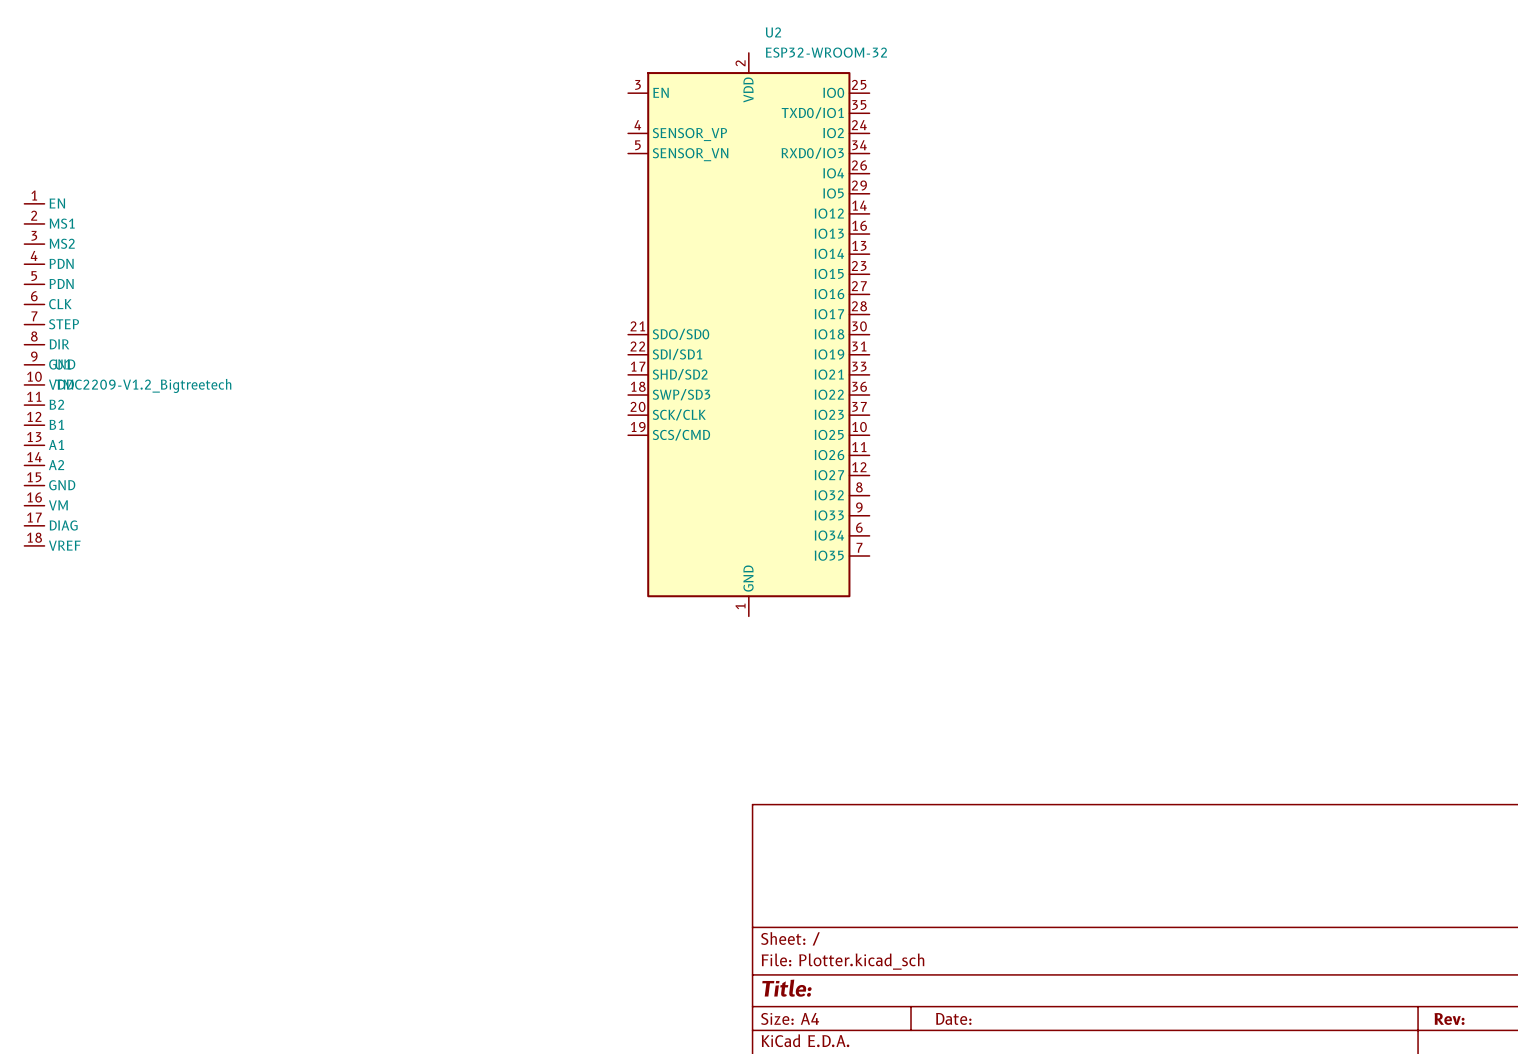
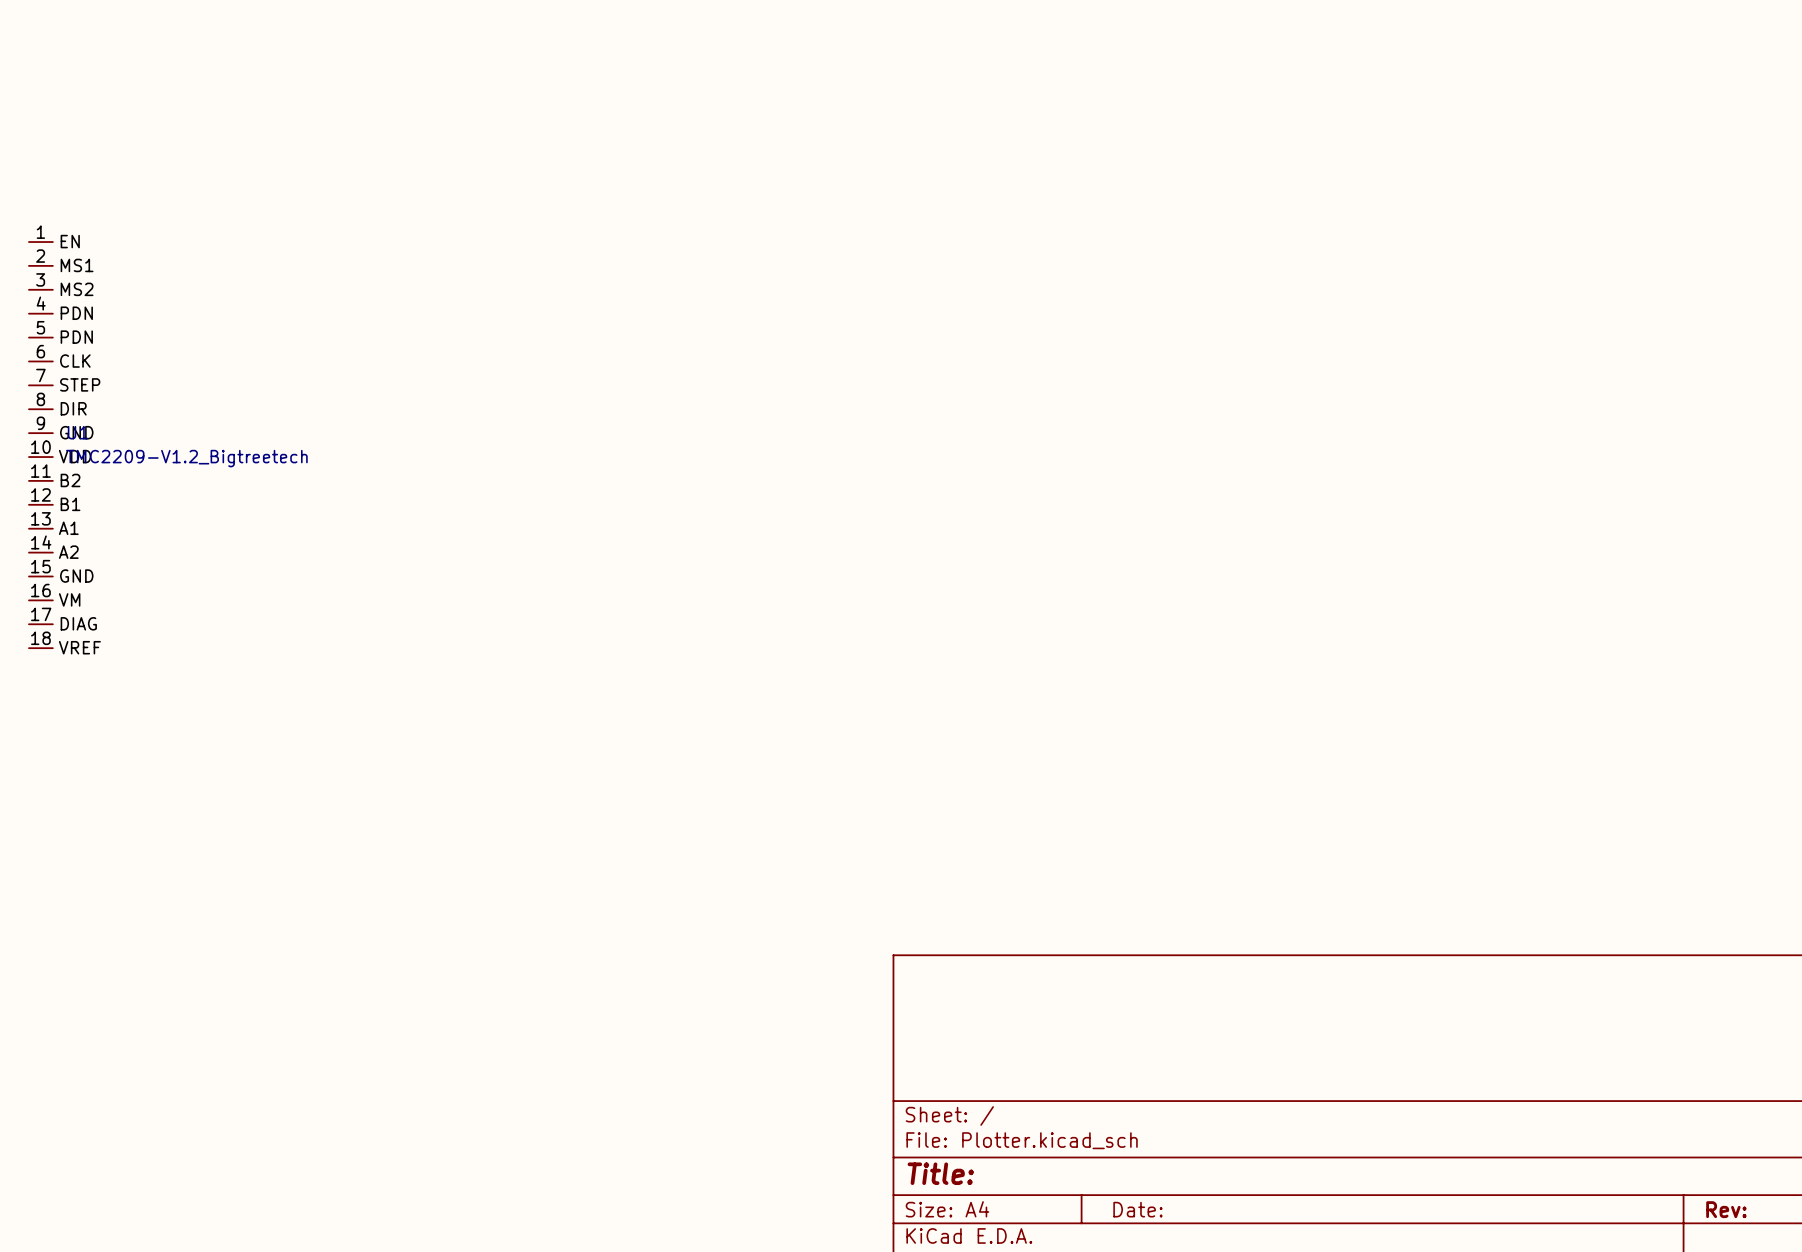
U2: ESP32-WROOM-32 (748, 334) -> none

